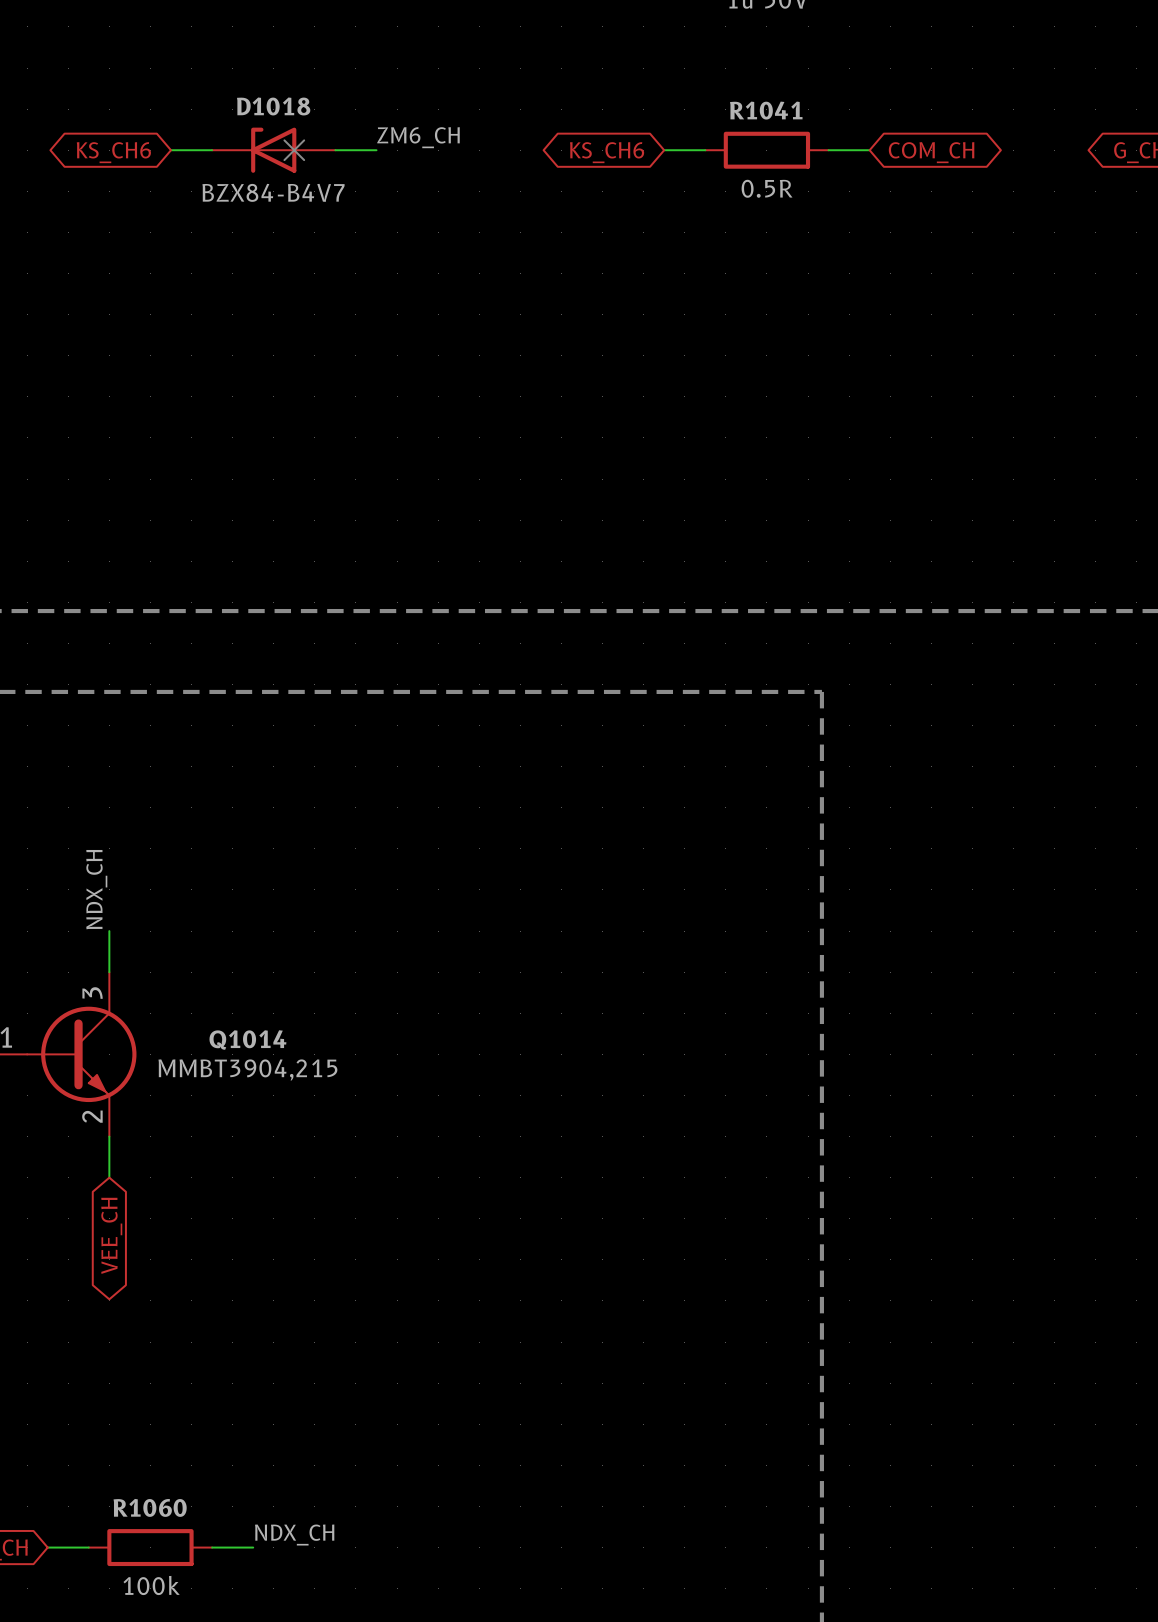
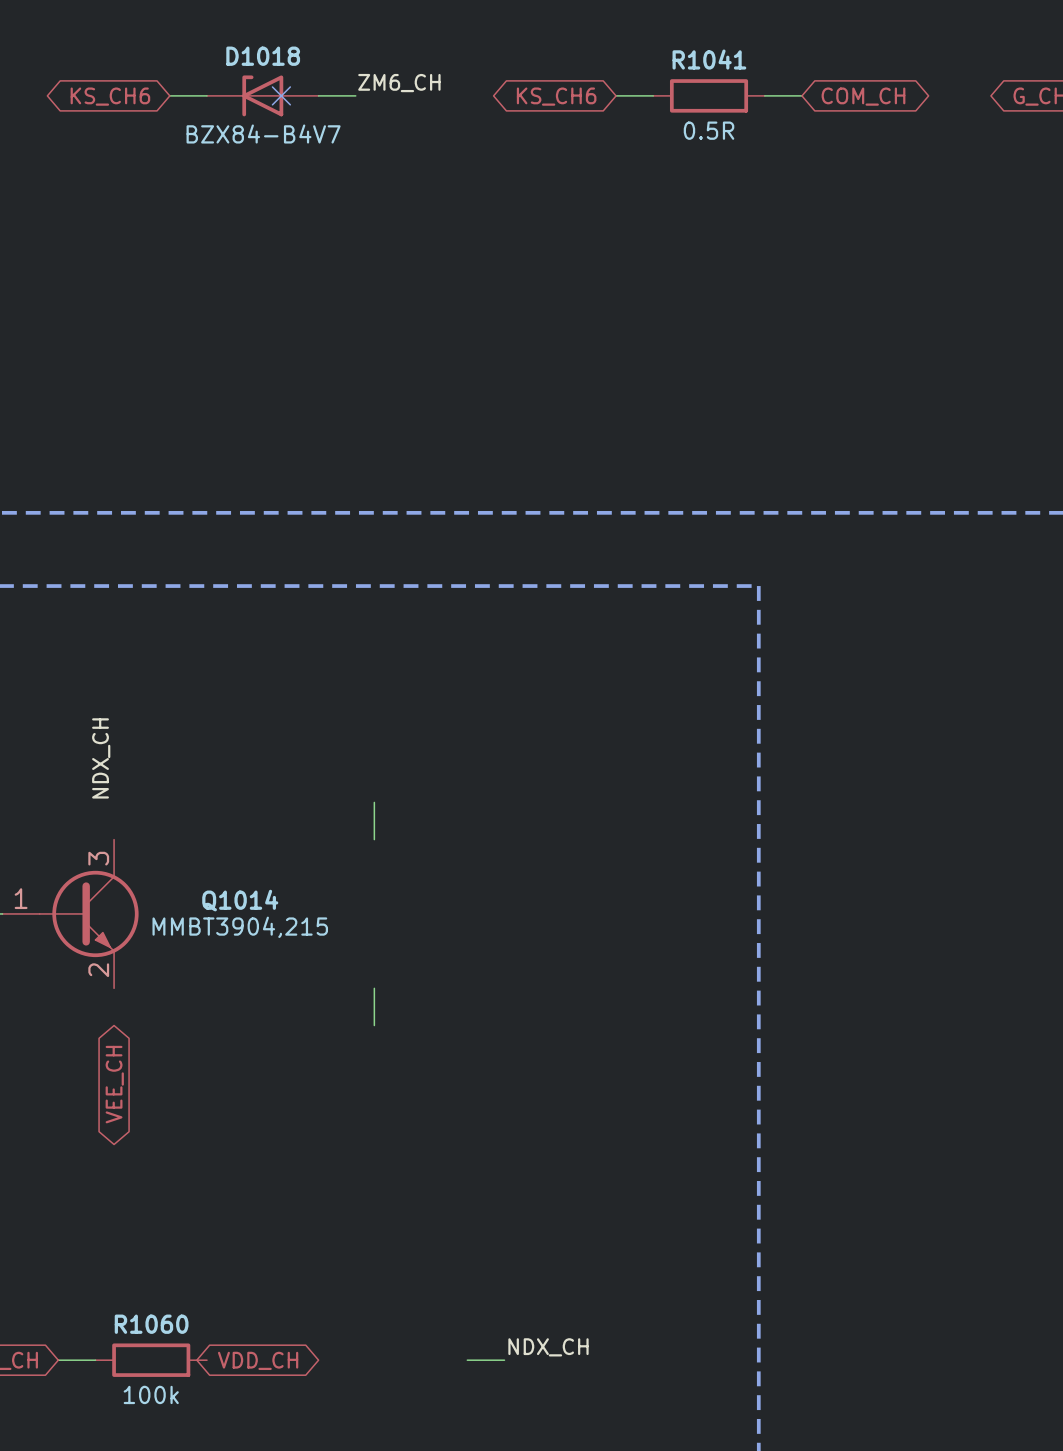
wire: (109, 931) (109, 972) -> (374, 802) (374, 839)
wire: (109, 1136) (109, 1177) -> (374, 988) (374, 1025)
label: NDX_CH (294, 1535) -> none
label: none -> NDX_CH (548, 1347)
wire: (212, 1547) (253, 1547) -> (467, 1360) (504, 1360)
global label: none -> VDD_CH (258, 1360)

